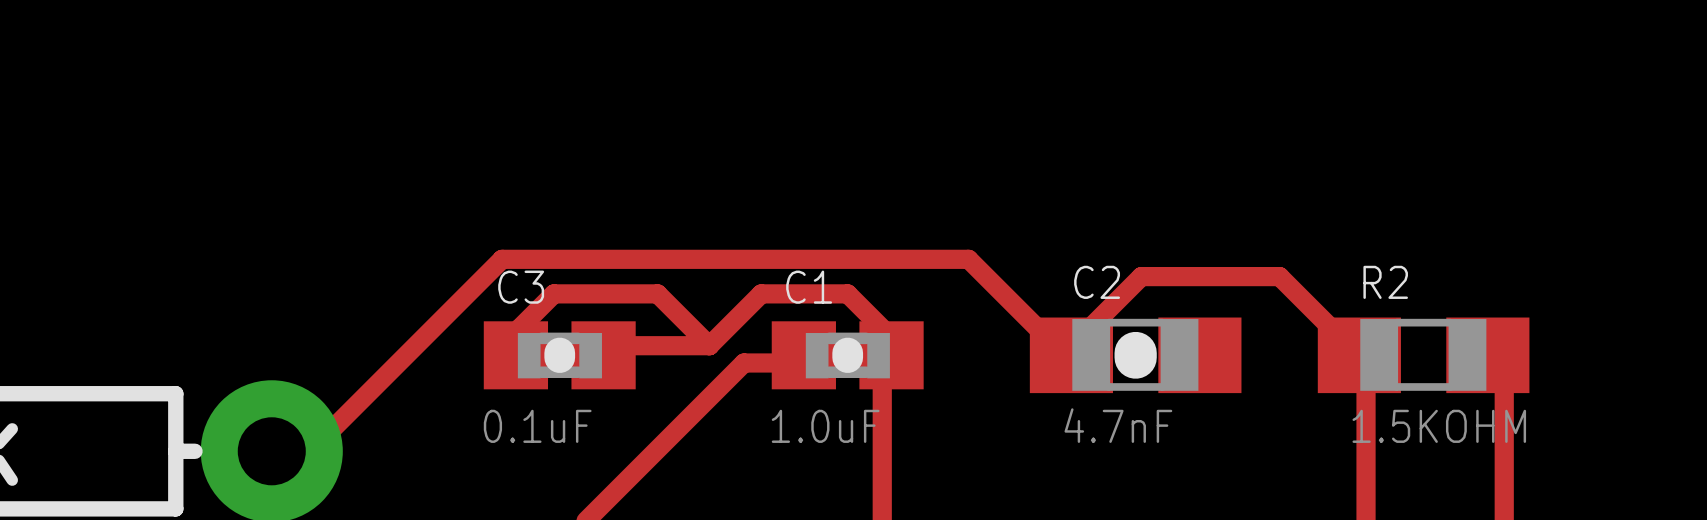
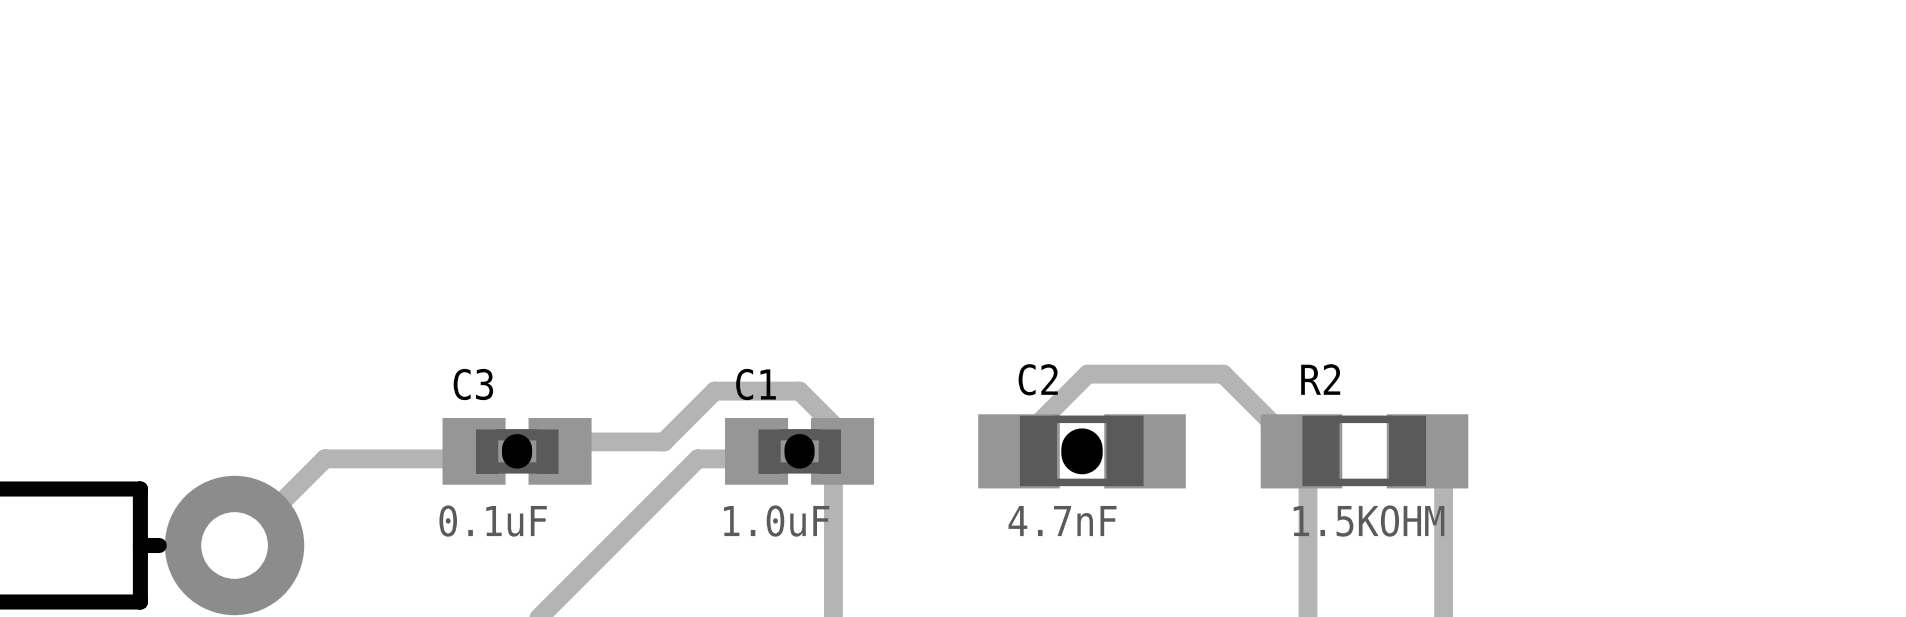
track: (709, 345) (657, 293) (553, 293) (519, 328) (519, 345) (515, 355) -> (240, 543) (324, 458) (460, 458) (474, 451)
track: (1071, 355) (1055, 345) (968, 259) (502, 259) (312, 449) (277, 449) -> none

